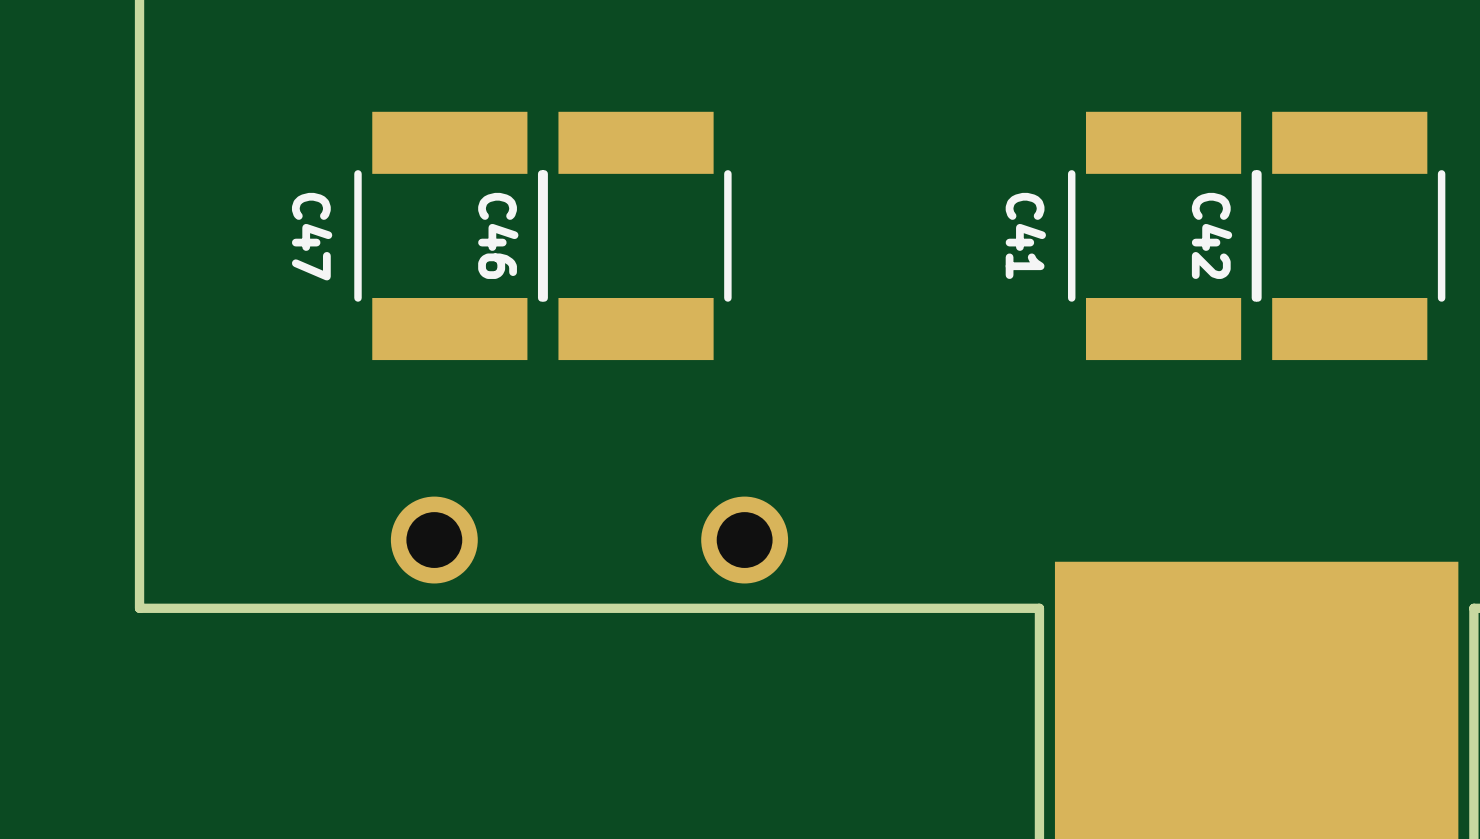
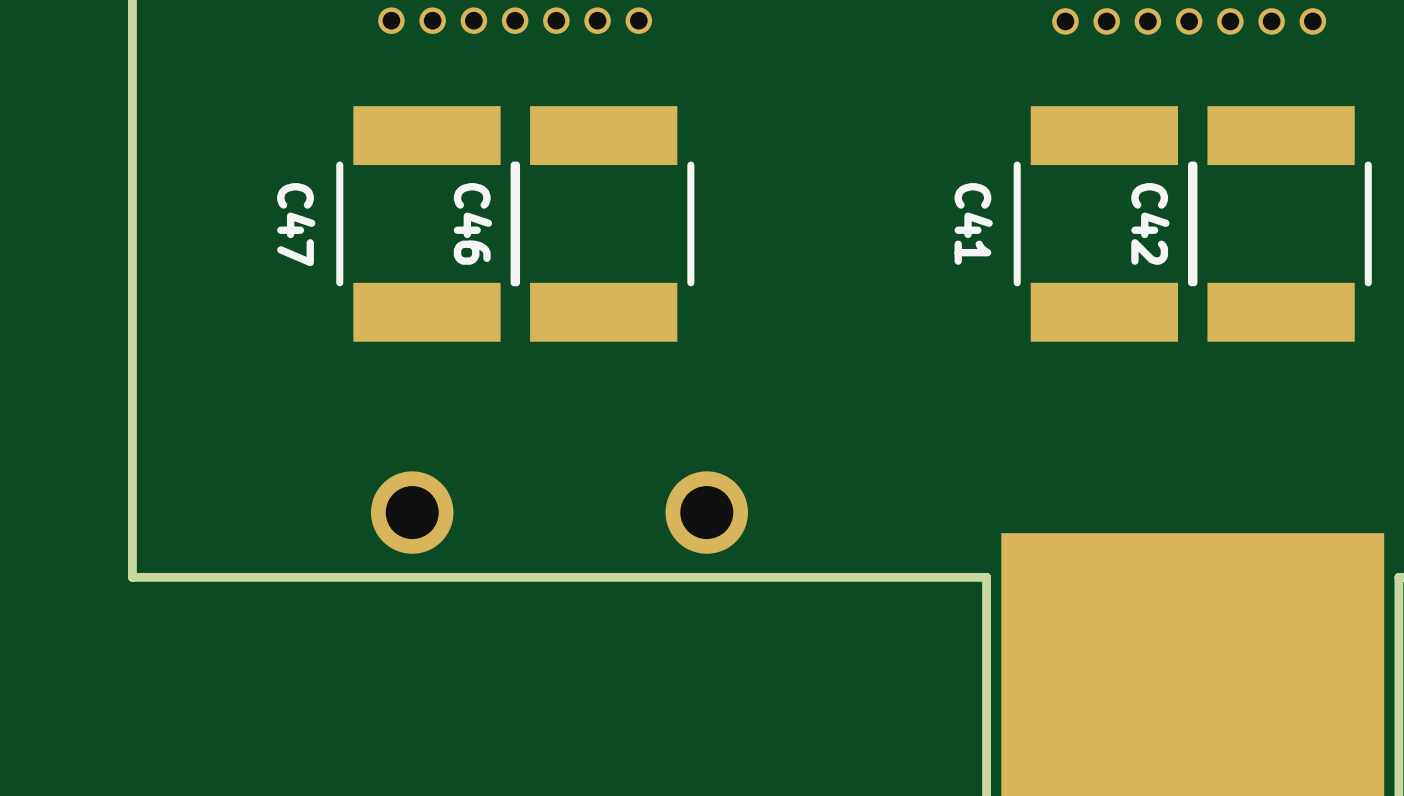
part: none -> (391, 20)
part: none -> (432, 20)
part: none -> (473, 20)
part: none -> (515, 20)
part: none -> (556, 20)
part: none -> (597, 20)
part: none -> (638, 20)
part: none -> (1065, 21)
part: none -> (1106, 21)
part: none -> (1147, 21)
part: none -> (1189, 21)
part: none -> (1230, 21)
part: none -> (1271, 21)
part: none -> (1312, 21)

